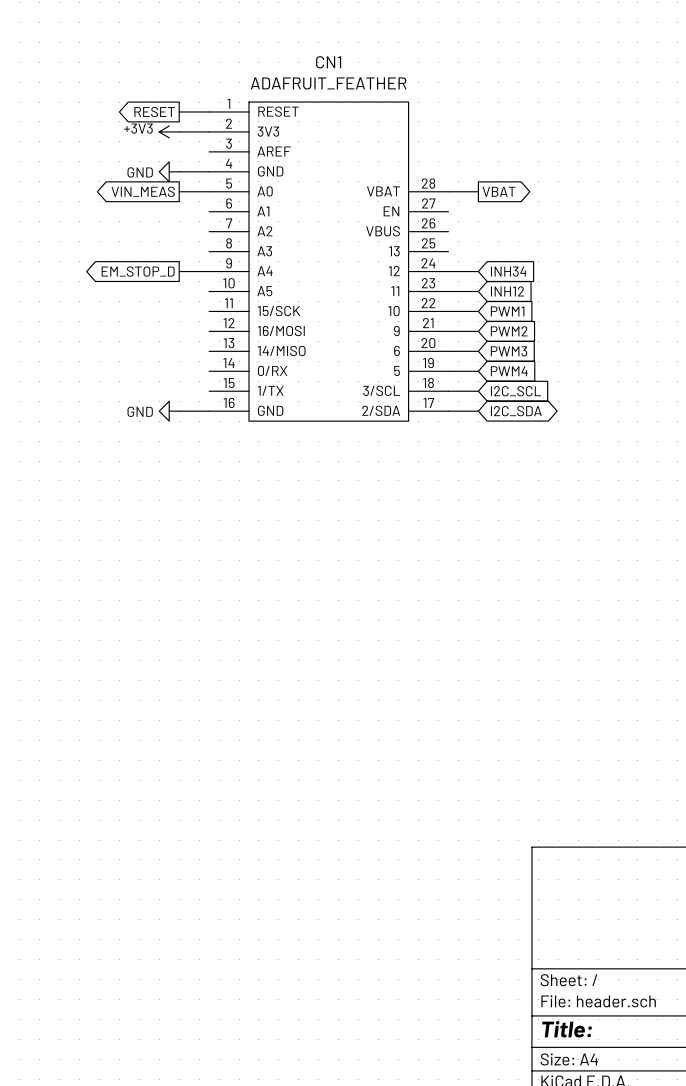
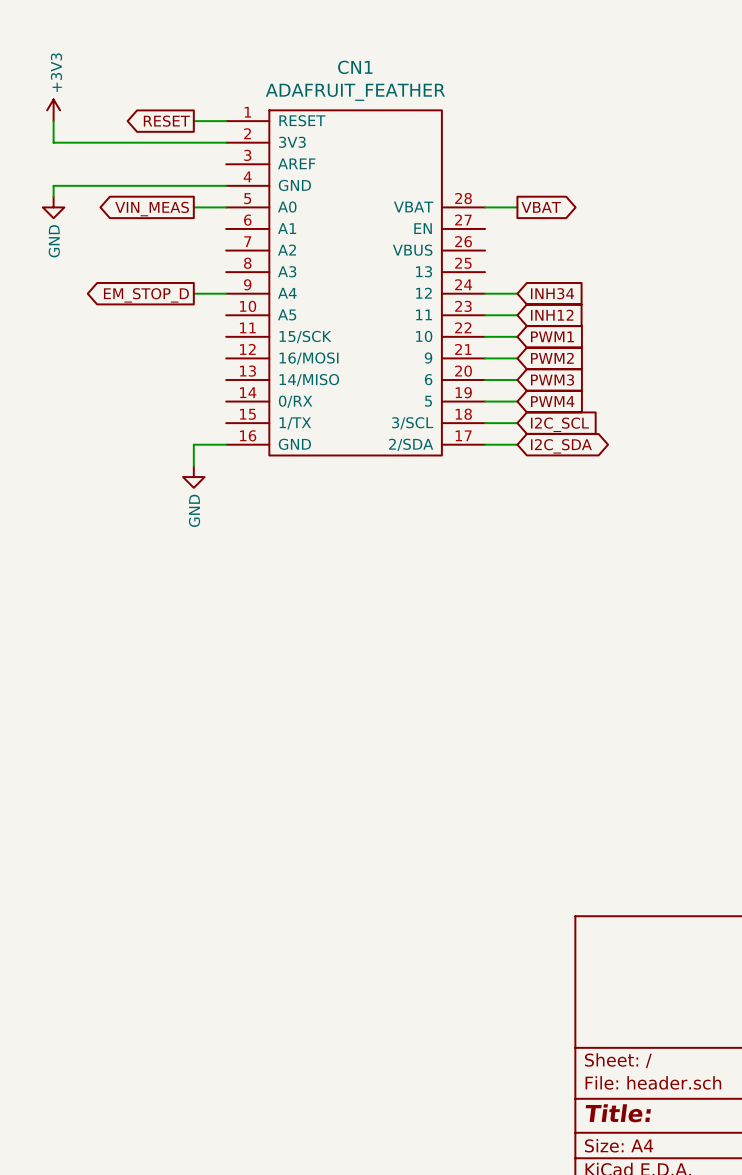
wire: none -> (53, 121) (53, 142) (193, 142)
power symbol rotation: 0° (169, 131) -> 90° clockwise (53, 110)
power symbol position: +3V3 (169, 131) -> +3V3 (53, 110)
power symbol rotation: 0° (169, 171) -> 90° counterclockwise (53, 207)
power symbol position: GND (169, 171) -> GND (53, 207)
wire: none -> (193, 185) (53, 185) (53, 196)
power symbol rotation: 0° (169, 411) -> 90° counterclockwise (193, 477)
power symbol position: GND (169, 411) -> GND (193, 477)
wire: none -> (193, 444) (193, 466)

